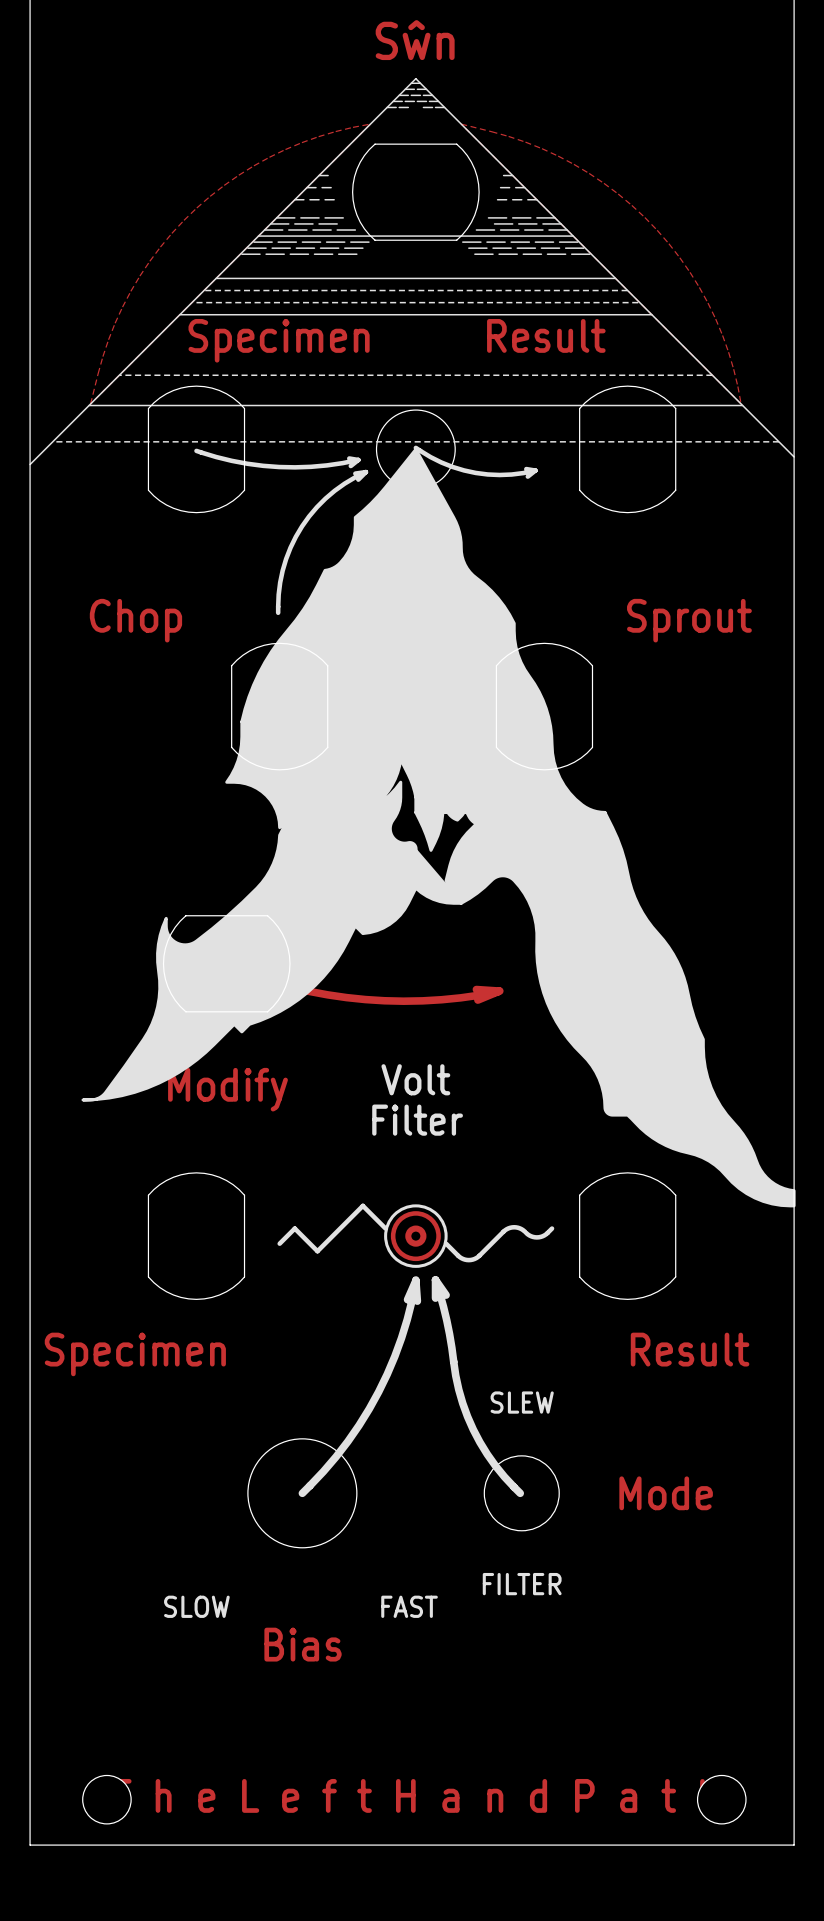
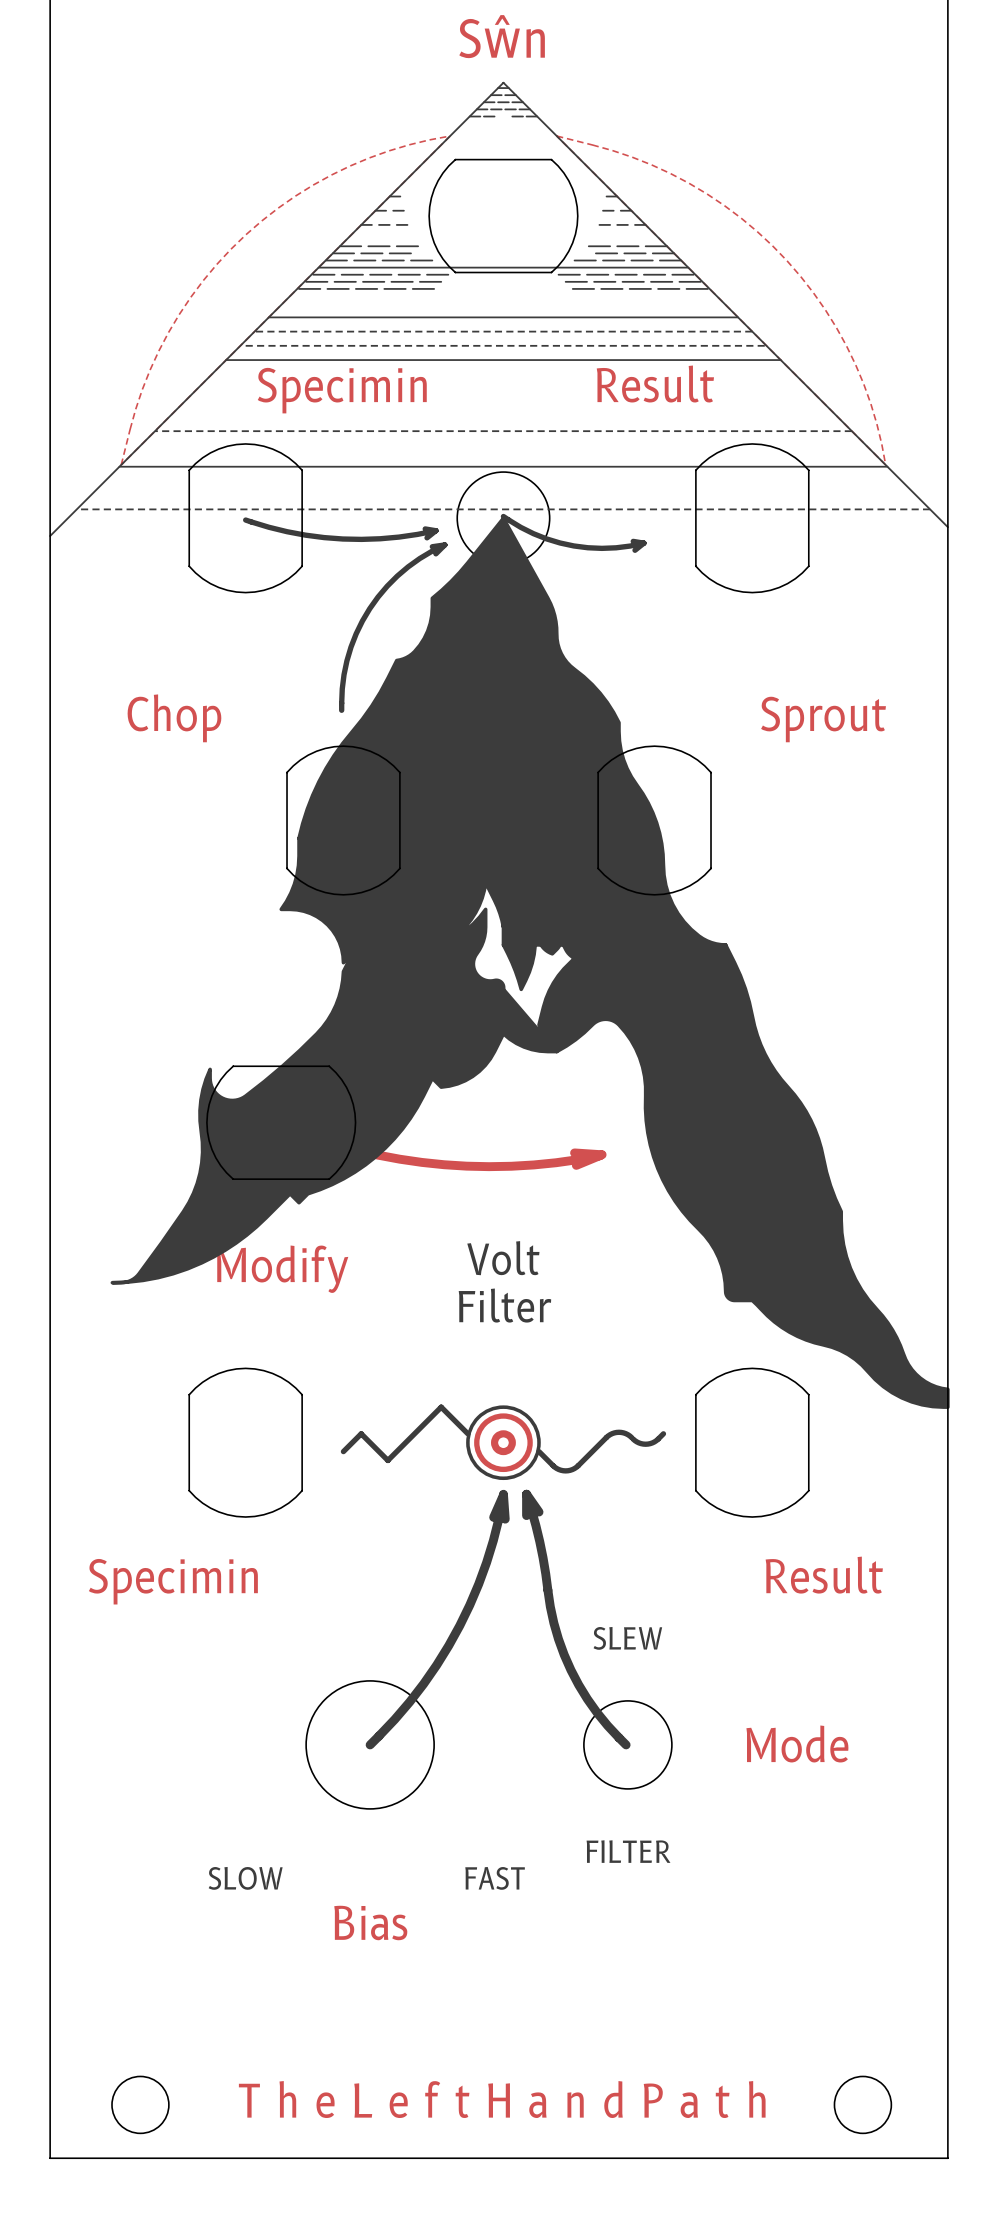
text: Specimen (279, 340) -> Specimin (342, 390)
text: Specimen (135, 1354) -> Specimin (173, 1581)

